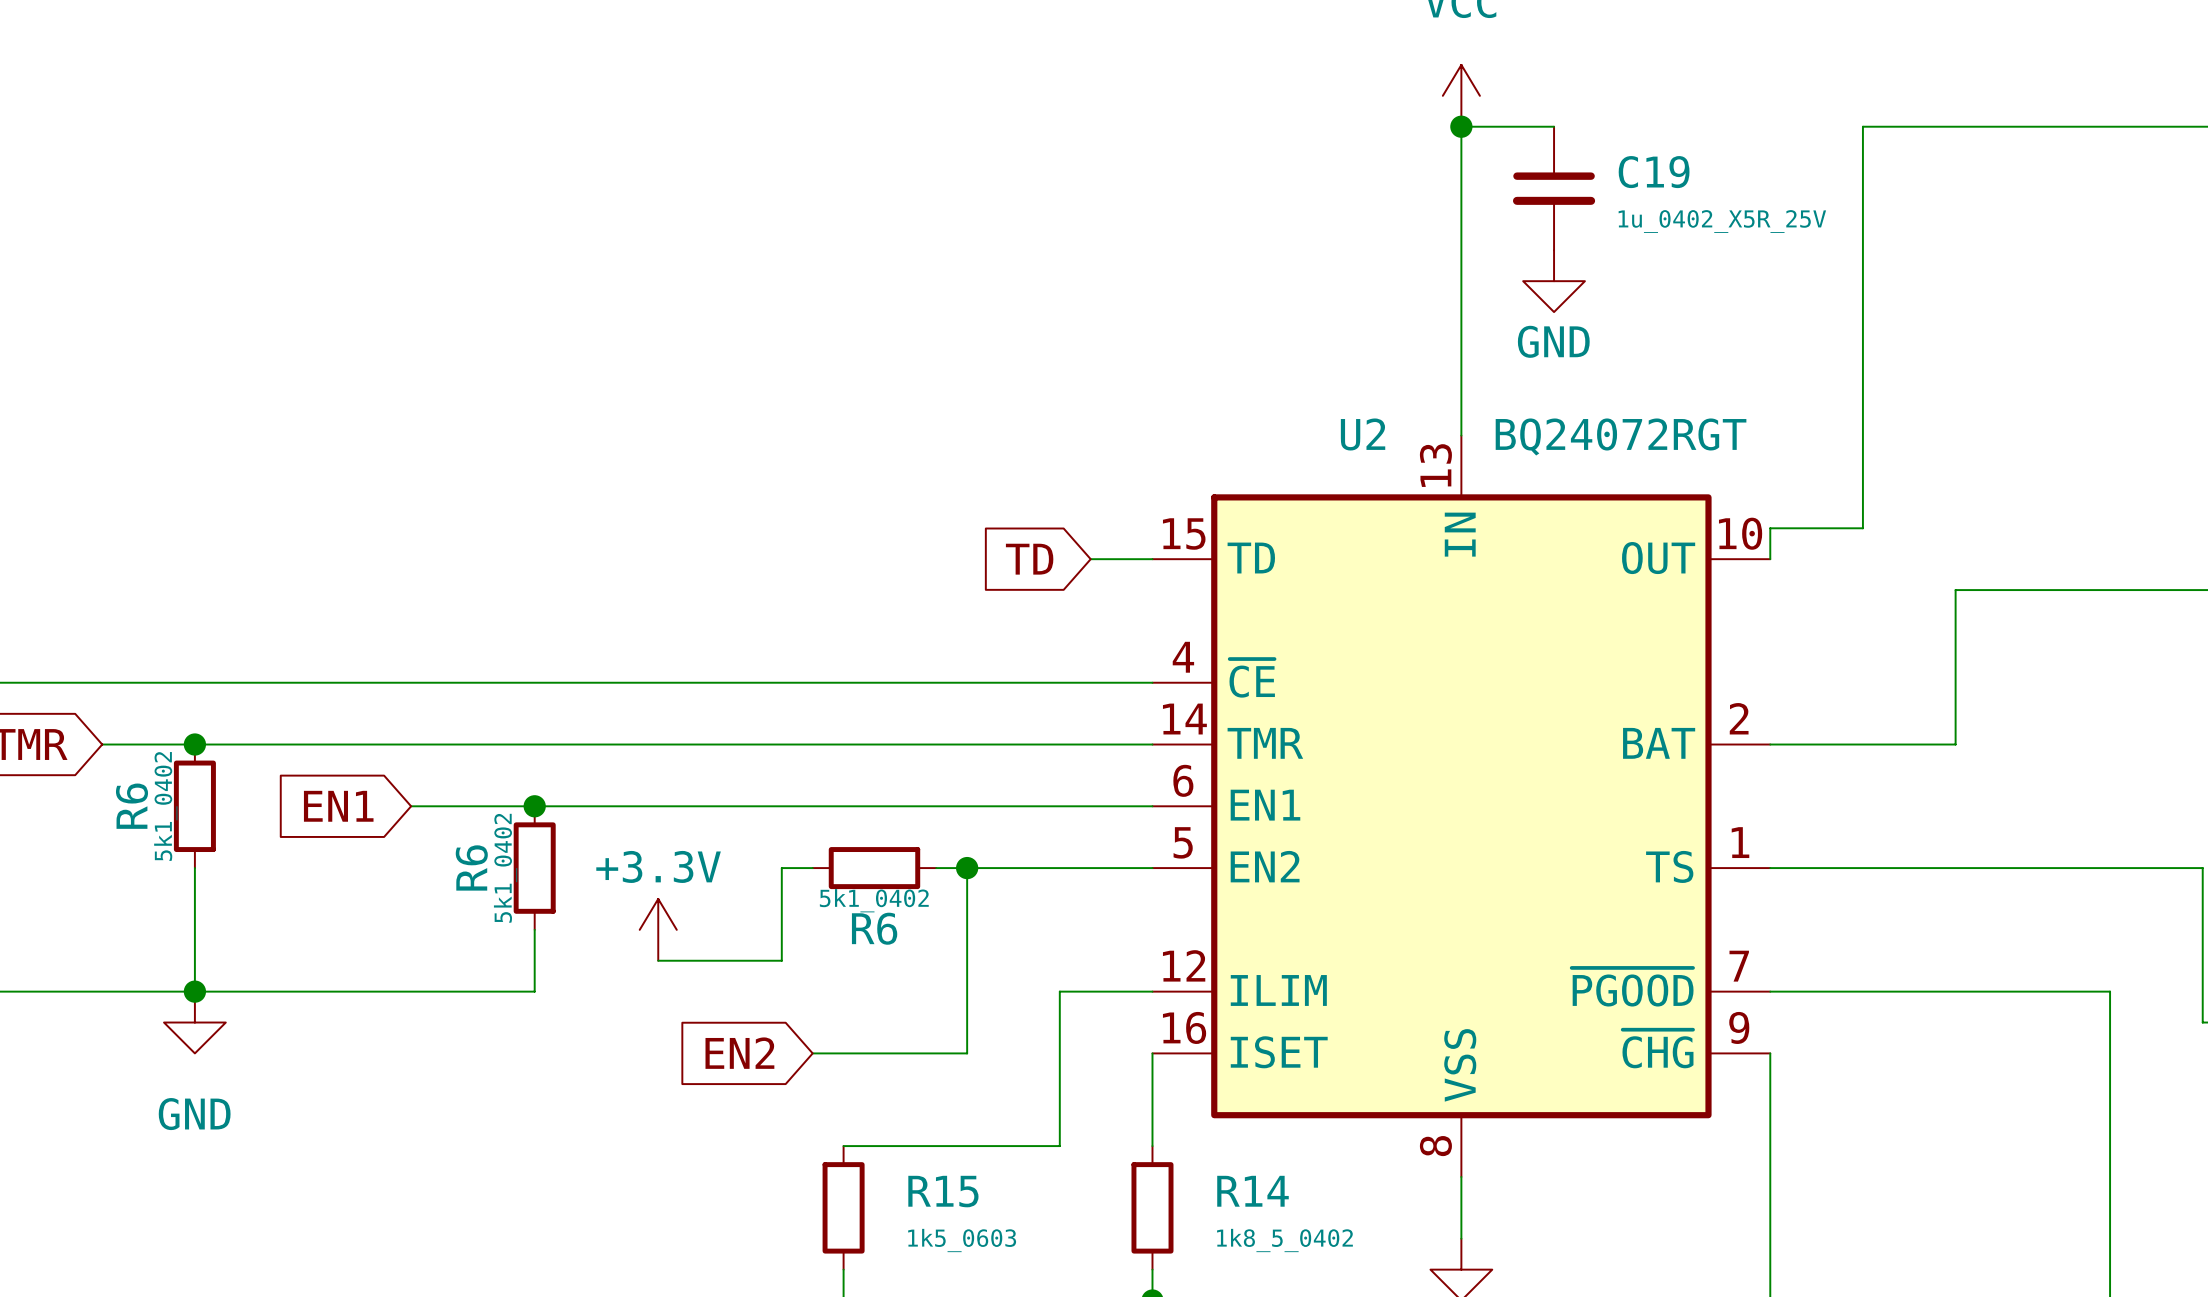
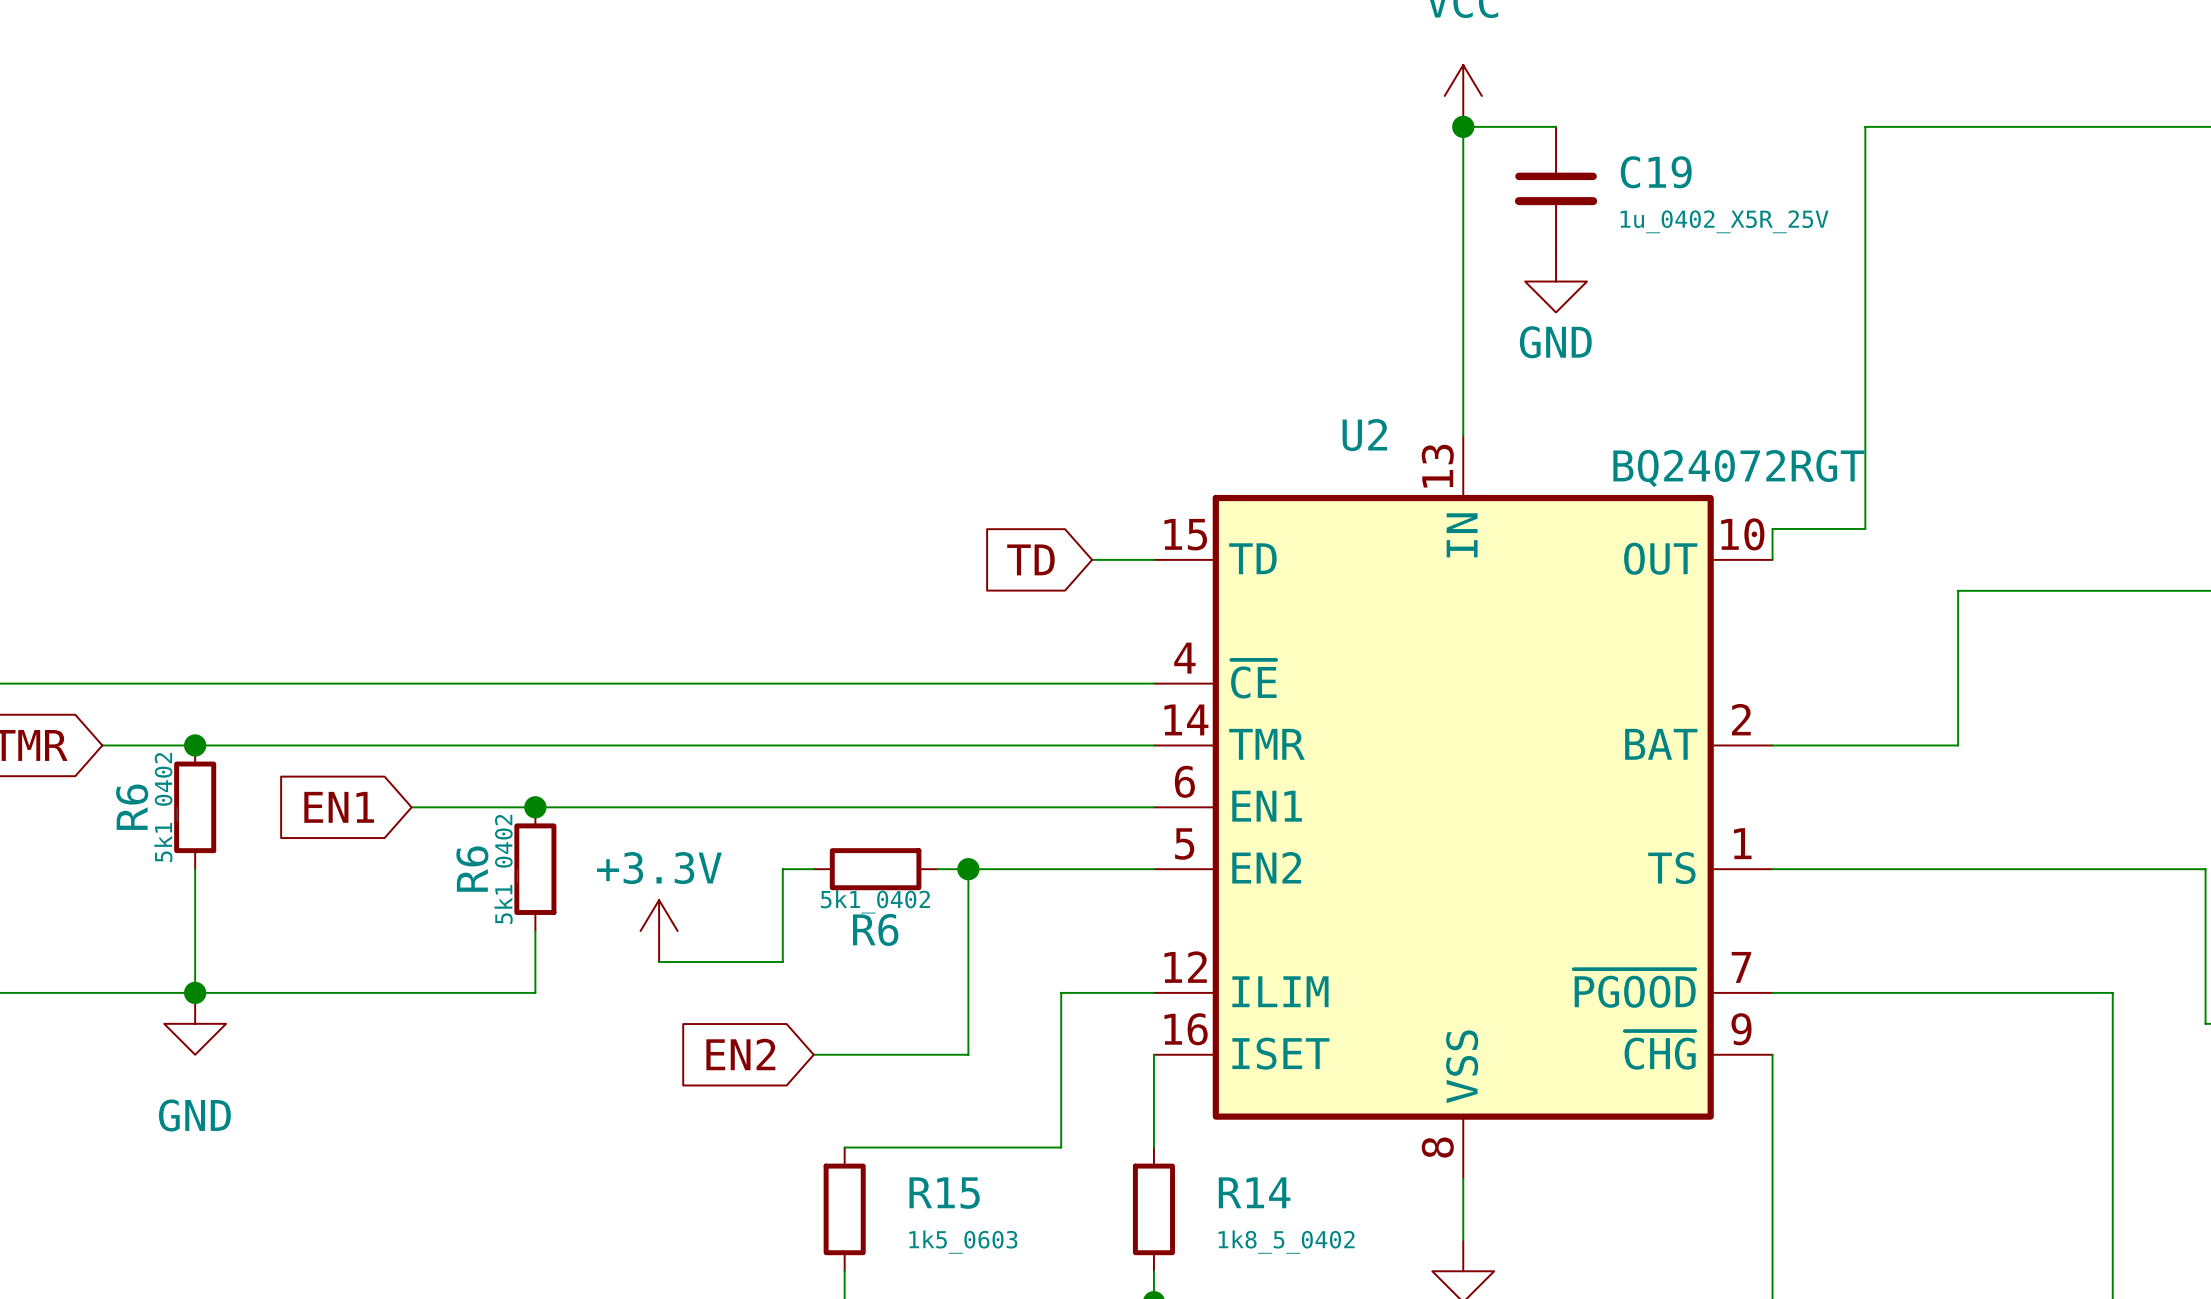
U2 value position: BQ24072RGT (1621, 436) -> BQ24072RGT (1738, 468)

